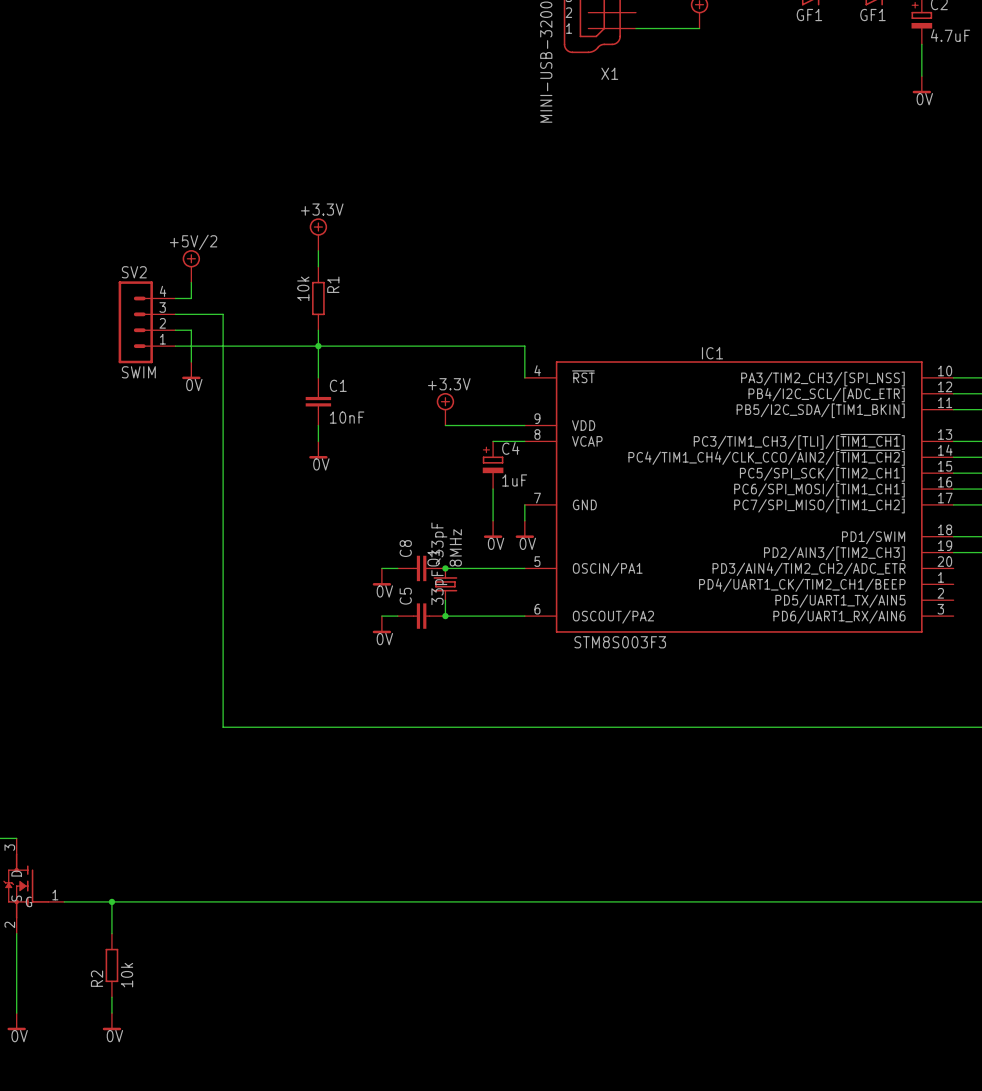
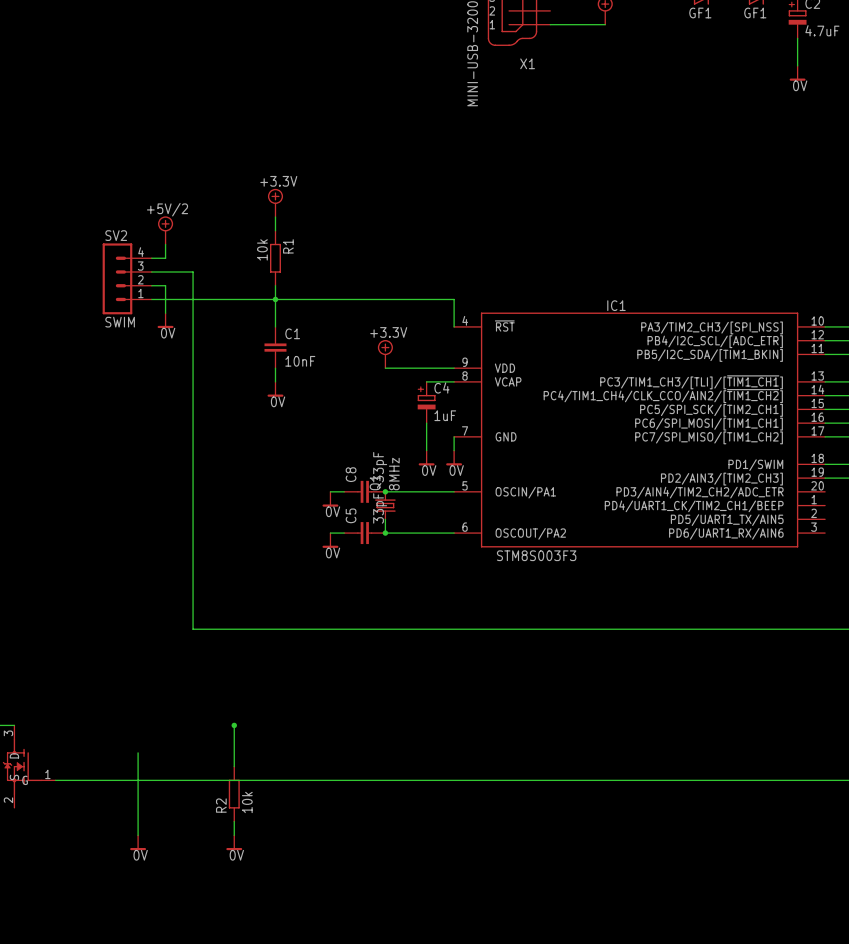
wire: none -> (234, 725) (234, 766)
junction: none -> (234, 725)
wire: none -> (138, 752) (138, 835)
wire: (111, 901) (111, 933) -> none
junction: (111, 901) -> none
wire: (16, 933) (16, 1013) -> none
wire: none -> (234, 821) (234, 835)
R2 position: (111, 965) -> (234, 794)
power symbol: none -> 0V (234, 842)
wire: (111, 997) (111, 1013) -> none
power symbol: 0V (16, 1021) -> none
power symbol position: 0V (111, 1021) -> 0V (138, 842)

